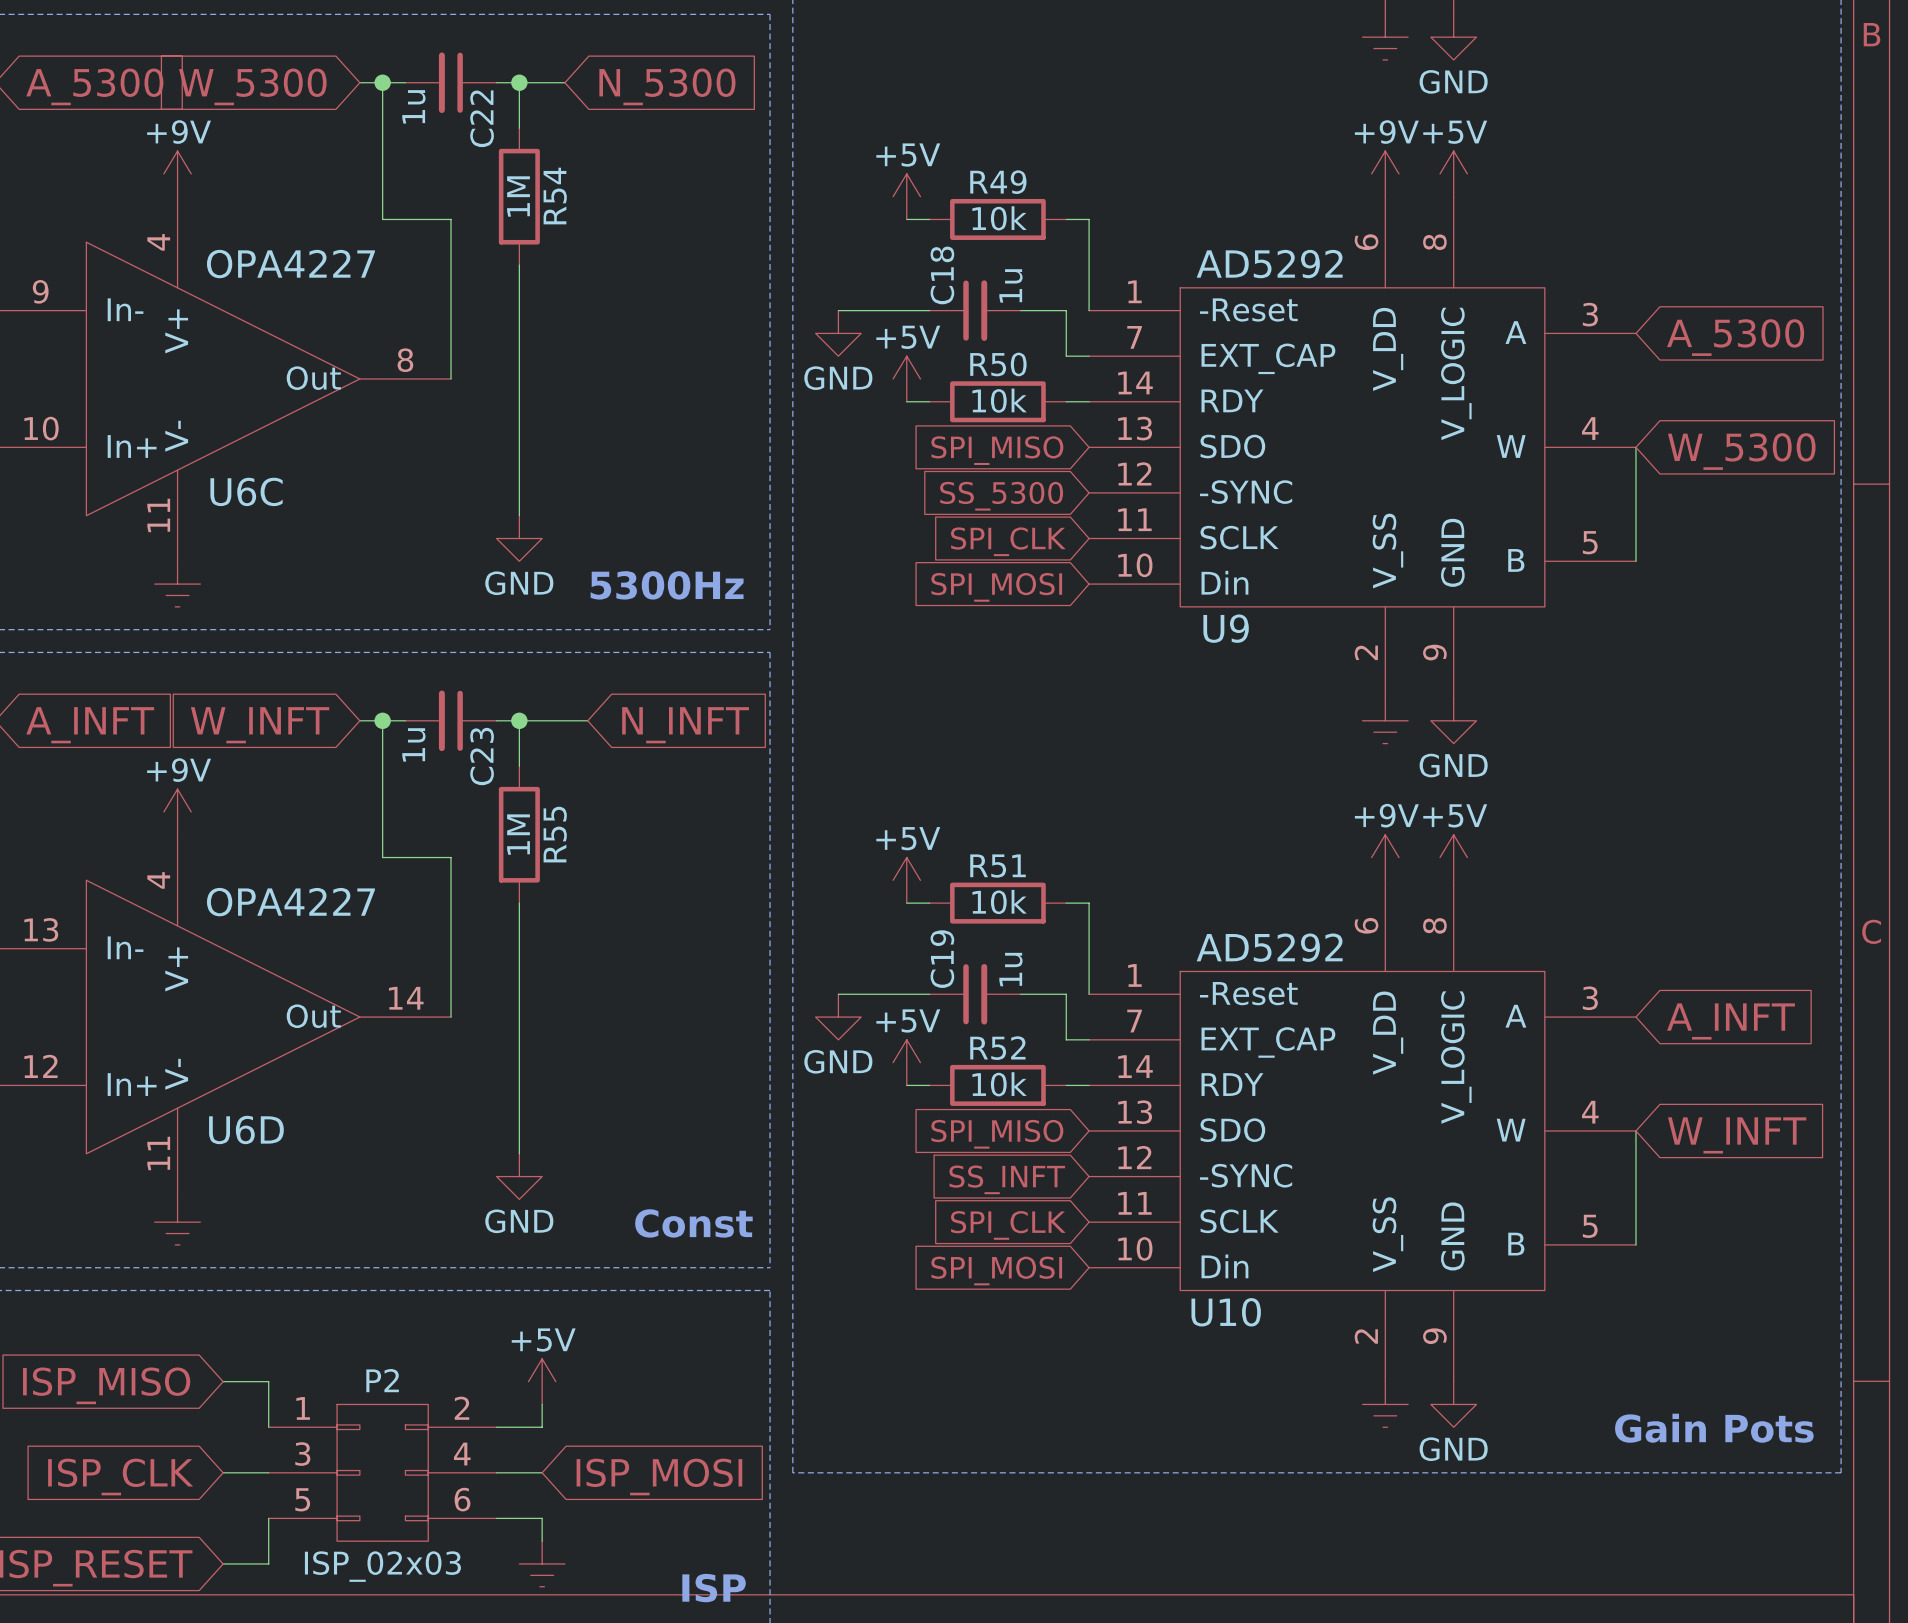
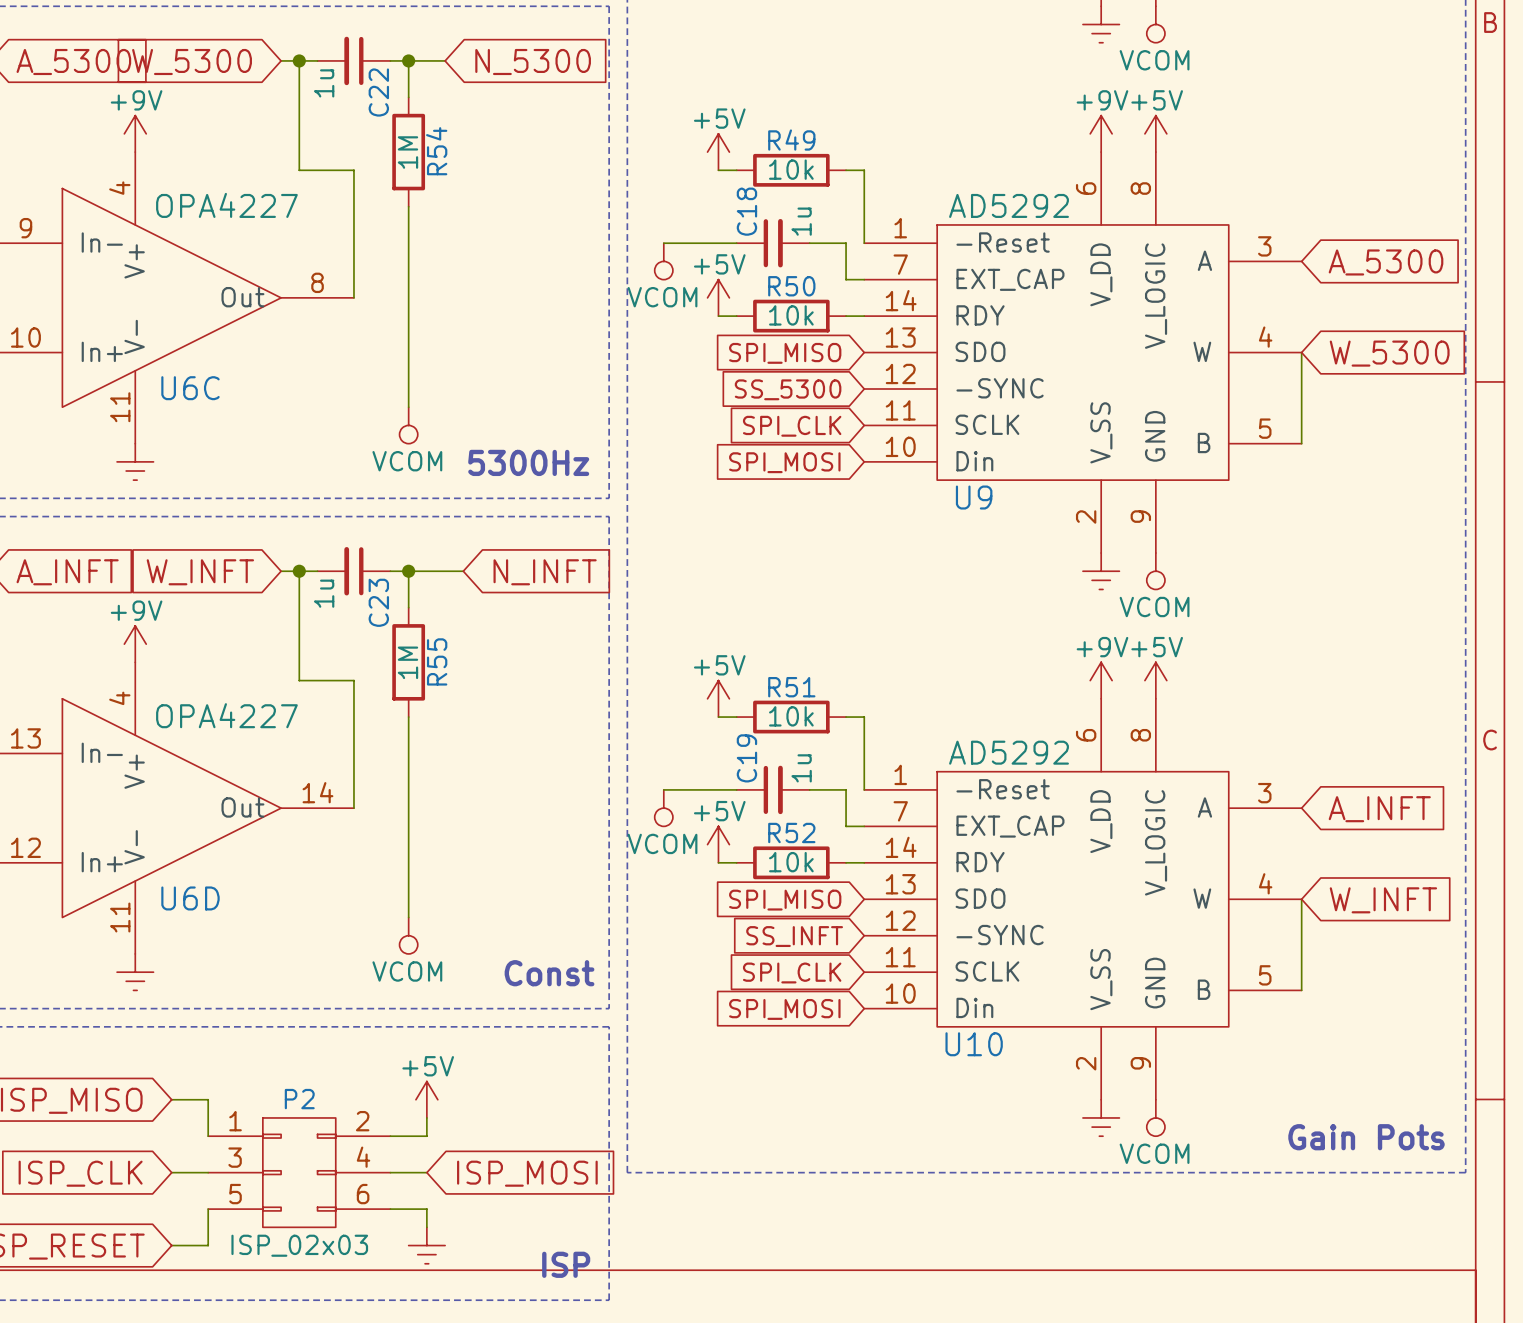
power symbol: GND (1453, 37) -> VCOM (1155, 24)
power symbol: GND (838, 333) -> VCOM (663, 261)
power symbol: GND (519, 538) -> VCOM (408, 425)
power symbol: GND (1453, 720) -> VCOM (1155, 571)
power symbol: GND (838, 1017) -> VCOM (663, 808)
power symbol: GND (519, 1176) -> VCOM (408, 935)
power symbol: GND (1453, 1404) -> VCOM (1155, 1117)

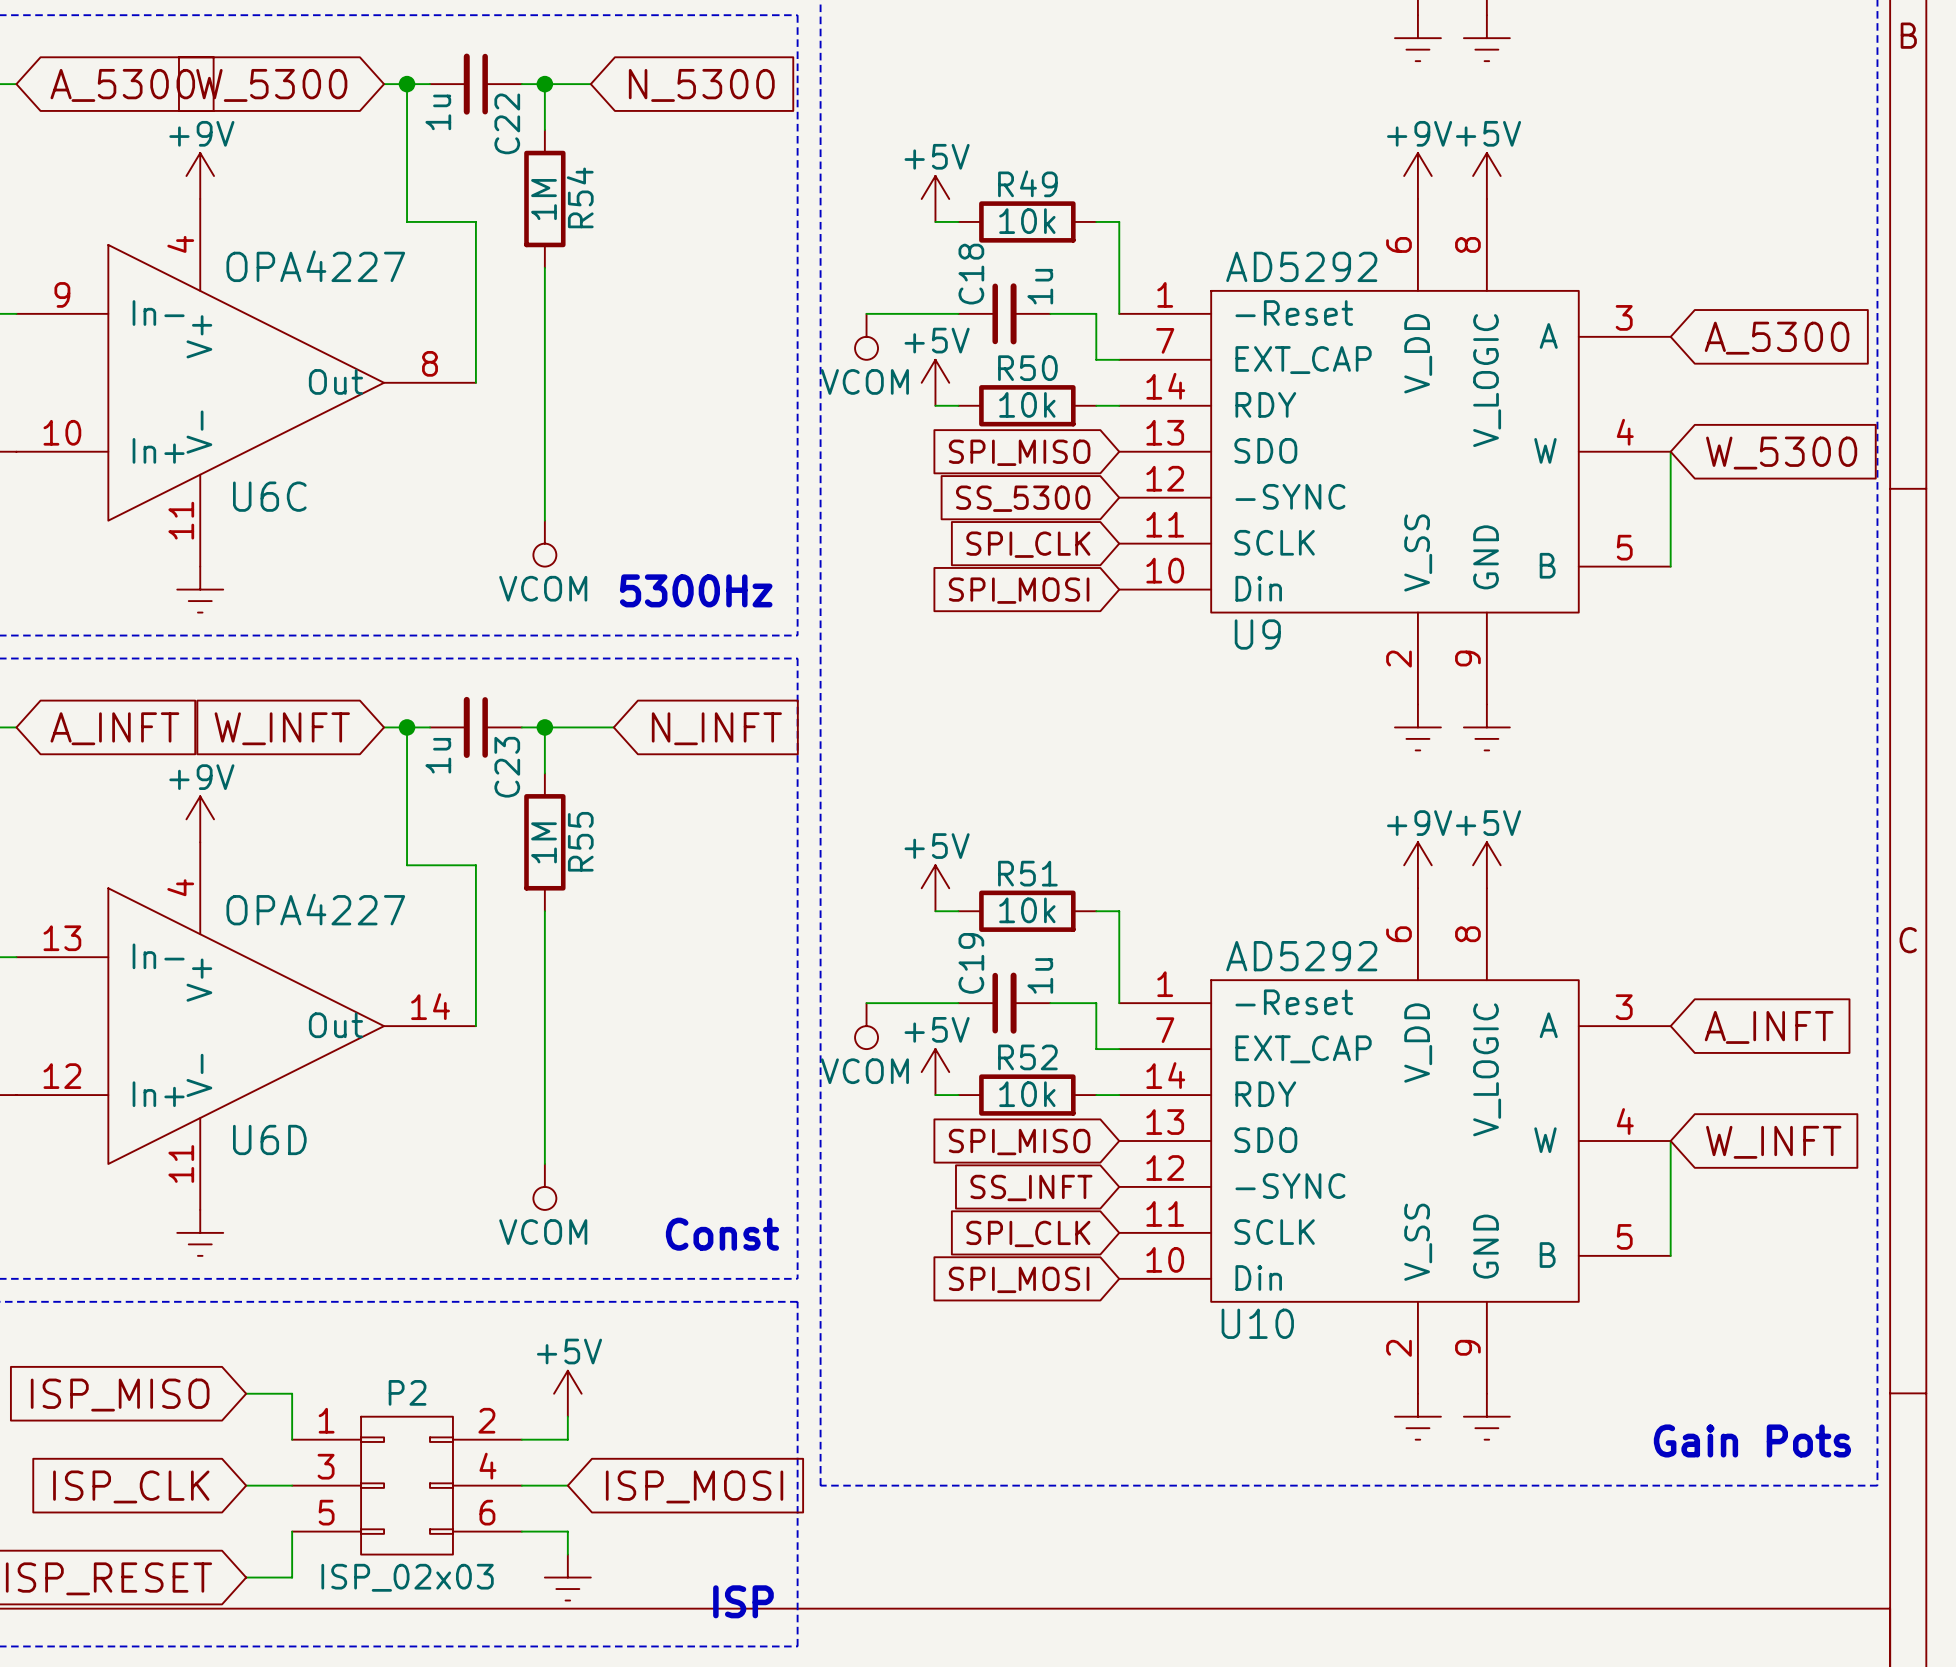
power symbol shape: [1146, 6, 1165, 43] -> [1463, 15, 1510, 62]
power symbol text: VCOM (1154, 60) -> none
power symbol shape: [1146, 553, 1165, 590] -> [1463, 704, 1510, 751]
power symbol text: VCOM (1154, 607) -> none
power symbol shape: [1146, 1099, 1165, 1137] -> [1463, 1393, 1510, 1440]
power symbol text: VCOM (1154, 1153) -> none

